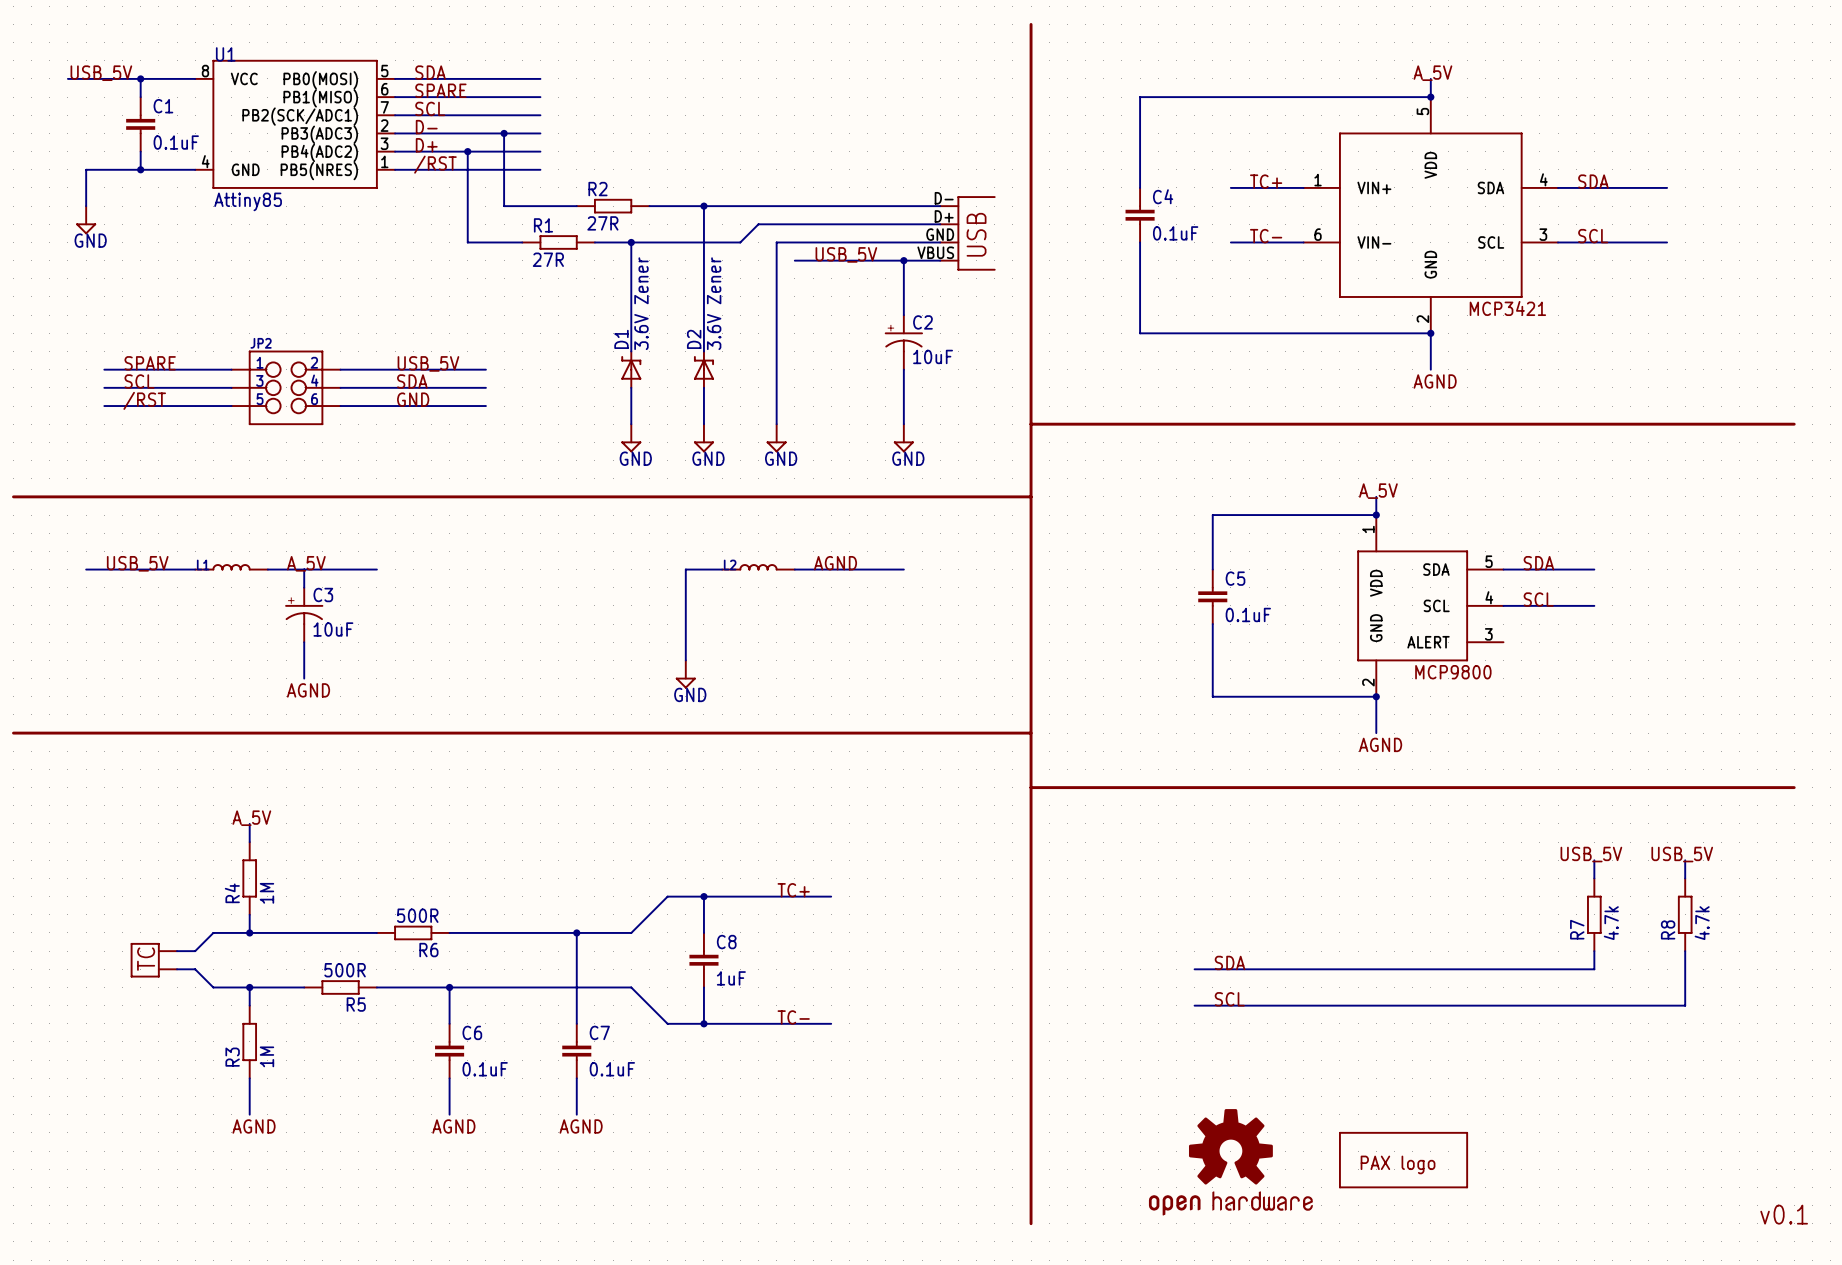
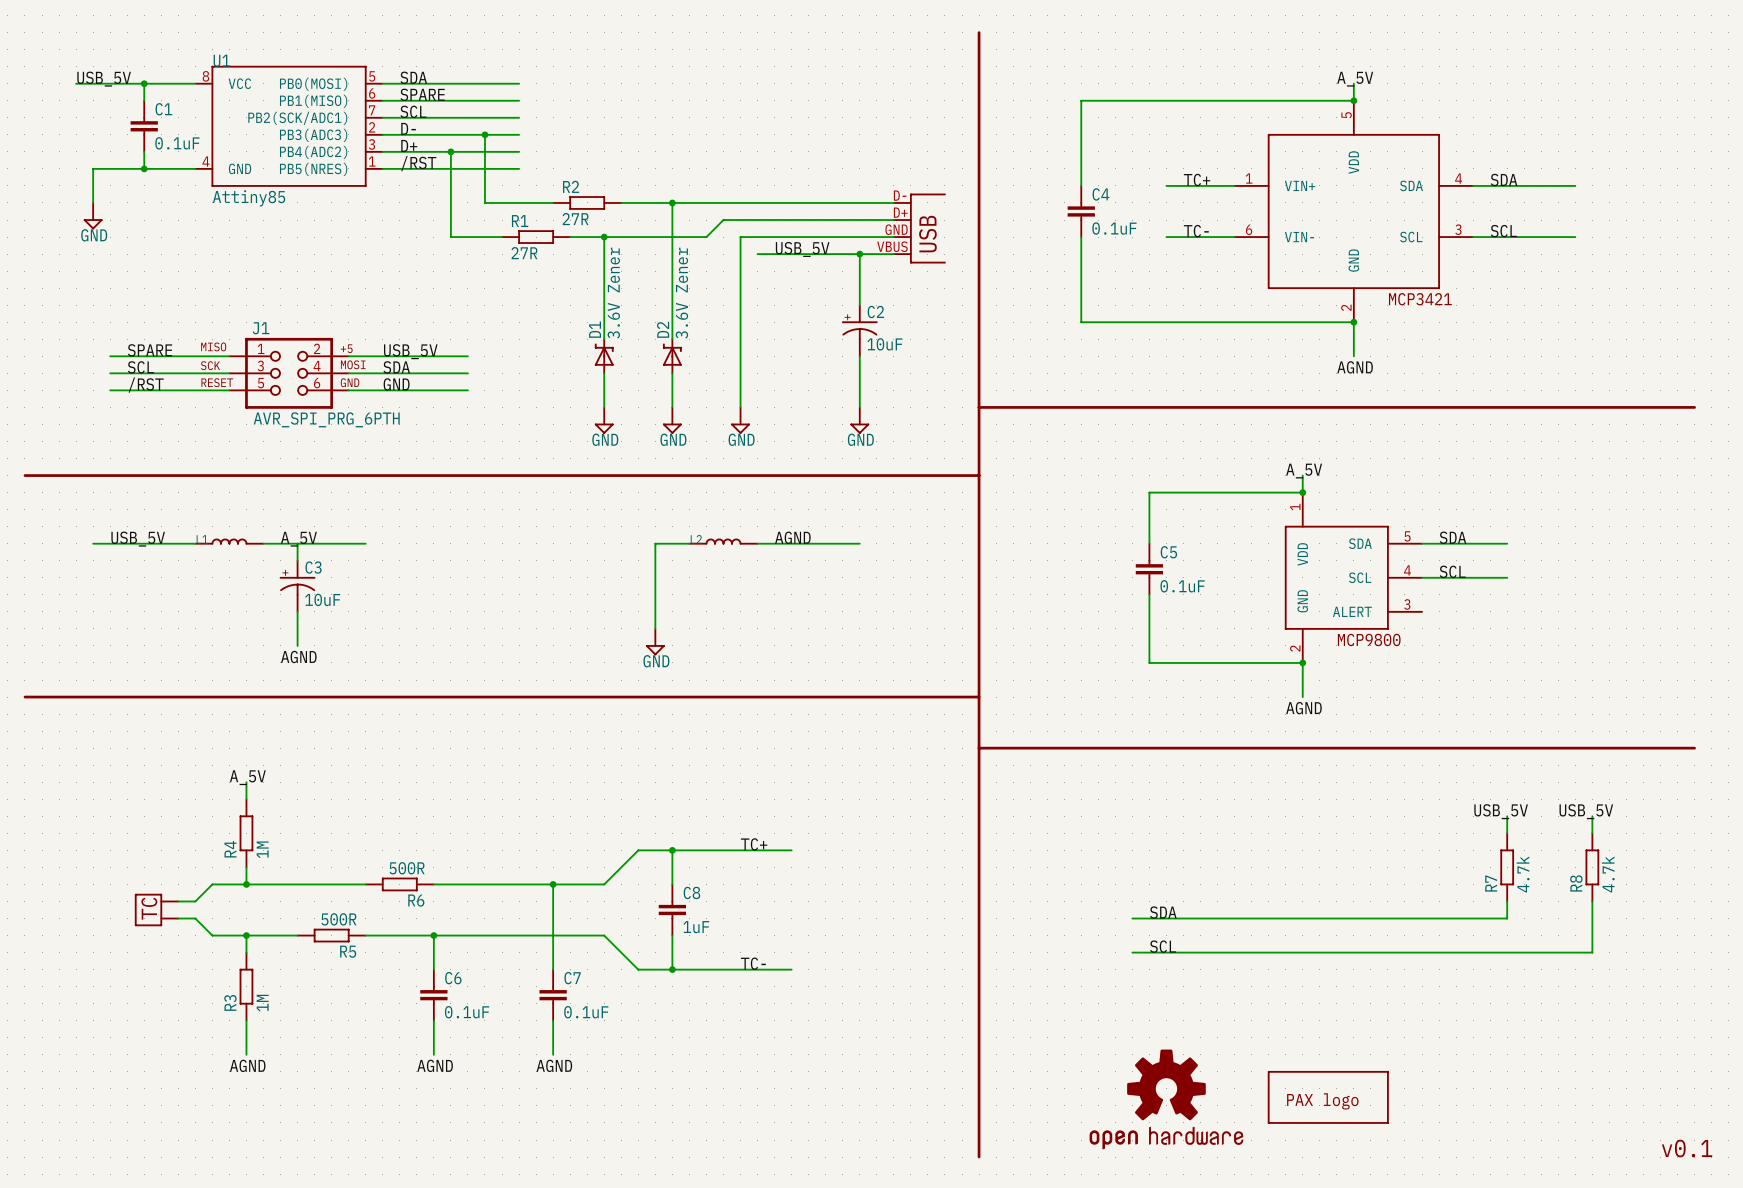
JP2: (286, 387) -> none
J1: none -> AVR_SPI_PRG_6PTH (289, 373)

